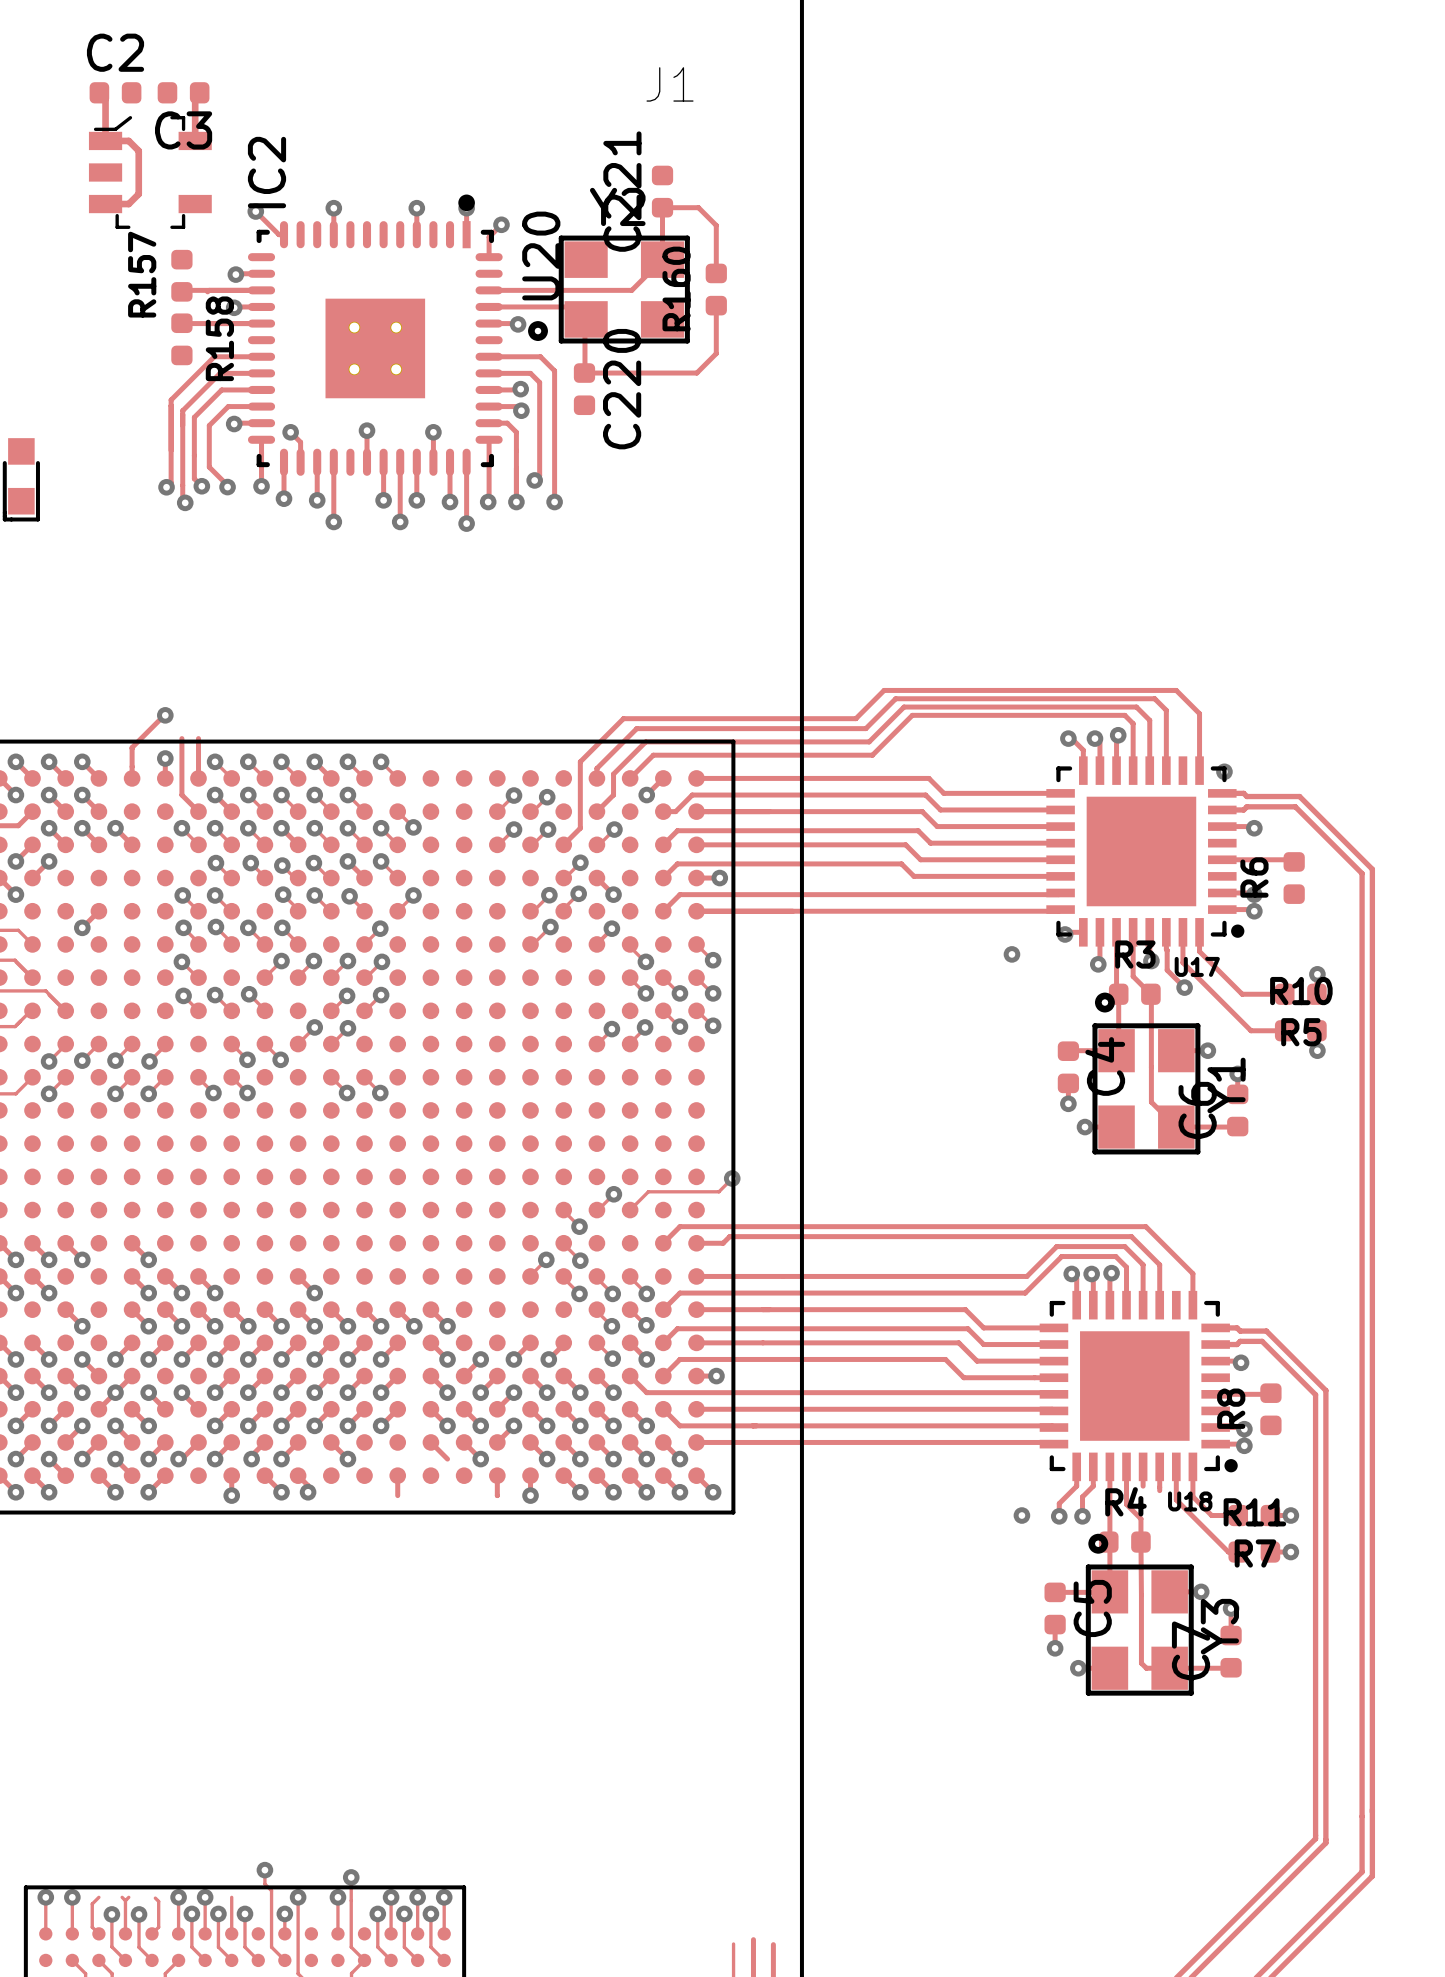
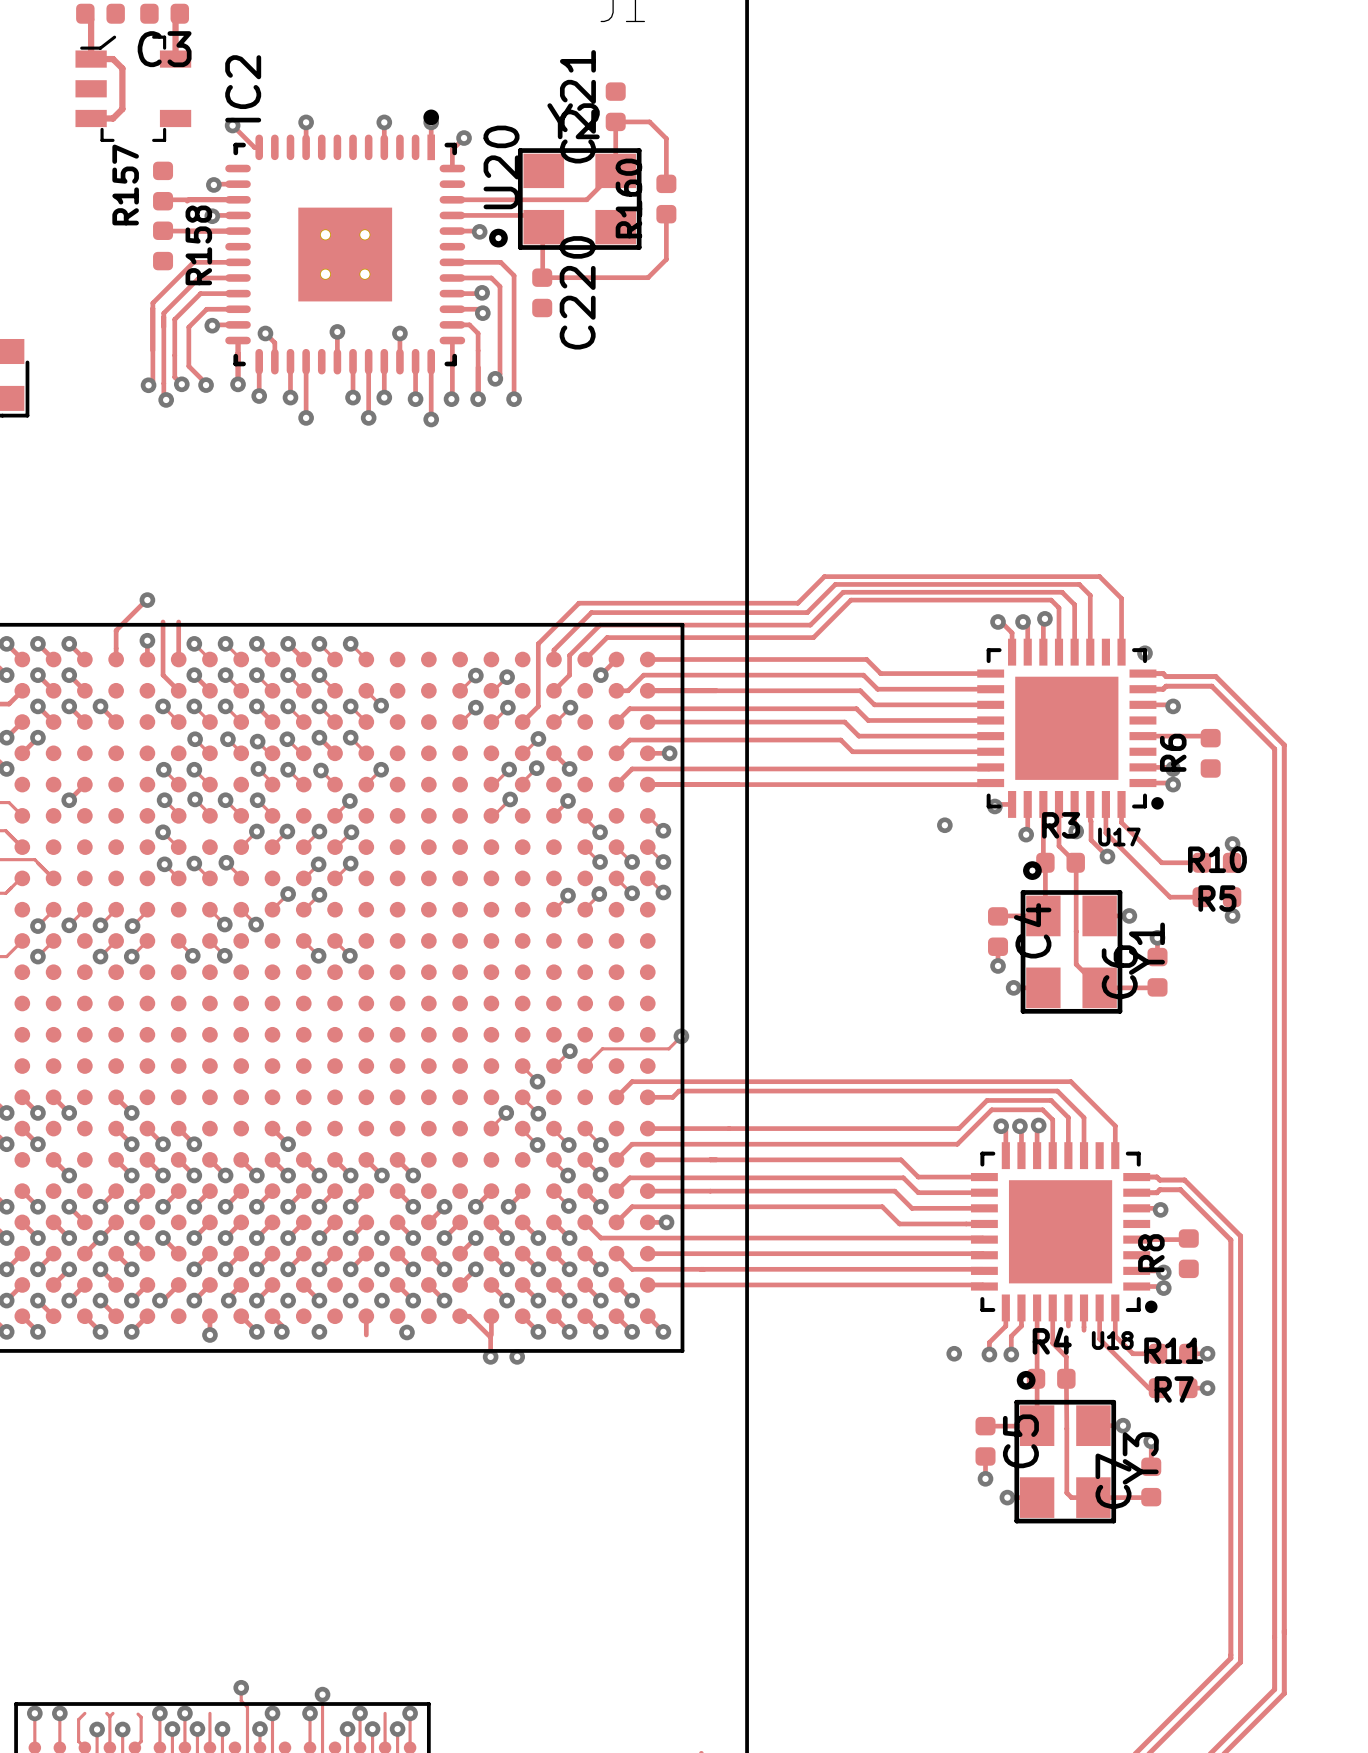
via: none -> (381, 1238)
via: none -> (381, 1269)
via: none -> (288, 1300)
via: none -> (350, 1300)
via: none -> (381, 1300)
via: none -> (413, 1300)
track: (497, 1475) (497, 1495) -> (460, 1316) (469, 1316) (490, 1337) (490, 1356)
via: none -> (319, 1331)
via: none -> (406, 1332)
via: (530, 1495) -> none
via: none -> (490, 1356)
via: none -> (517, 1356)
via: (417, 1897) -> none

